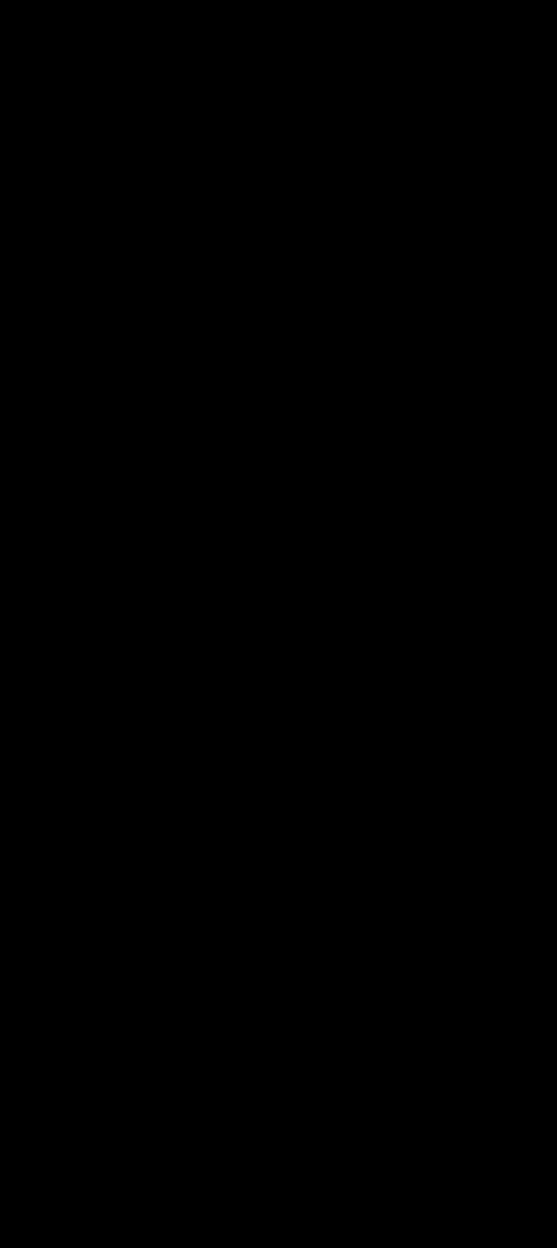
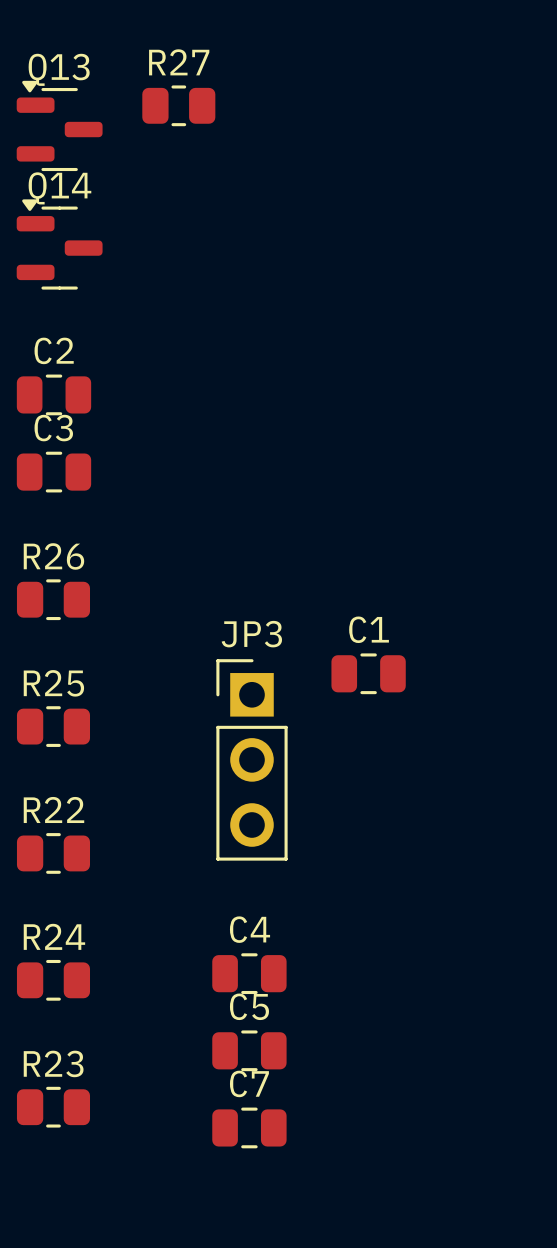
R27: none -> (178, 105)
Q13: none -> (59, 125)
Q14: none -> (59, 244)
C2: none -> (53, 394)
C3: none -> (53, 472)
R26: none -> (53, 599)
C1: none -> (368, 673)
R25: none -> (53, 726)
JP3: none -> (251, 759)
R22: none -> (53, 853)
C4: none -> (249, 973)
R24: none -> (53, 980)
C5: none -> (249, 1050)
R23: none -> (53, 1107)
C7: none -> (249, 1127)

